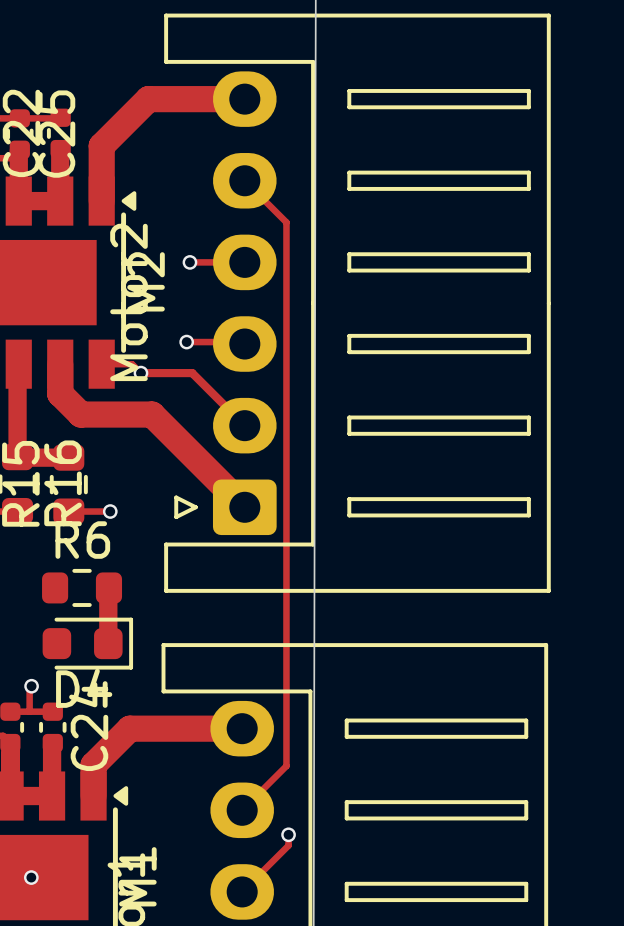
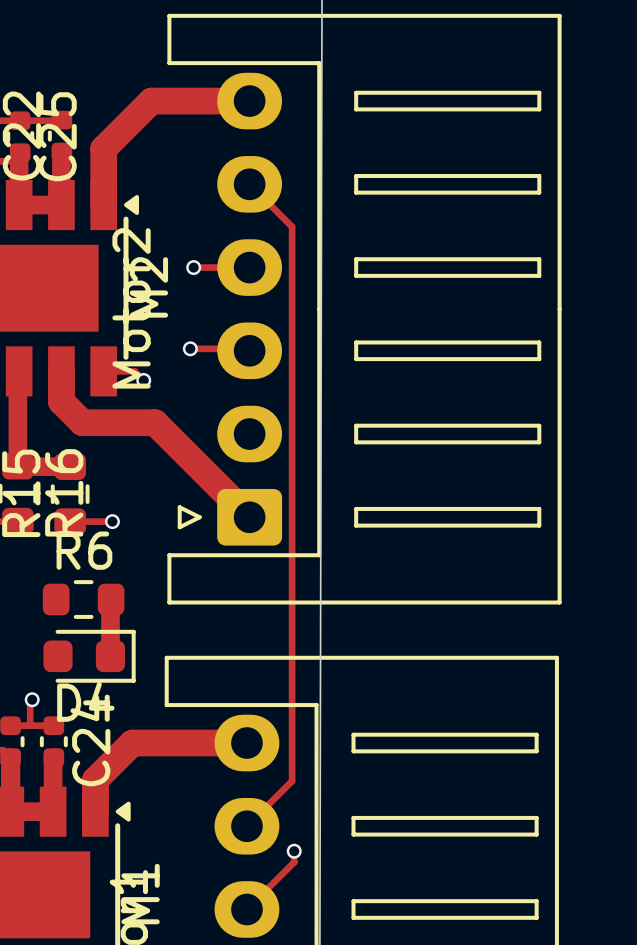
track: (140, 373) (192, 373) (244, 425) -> none
via: (31, 877) -> none

